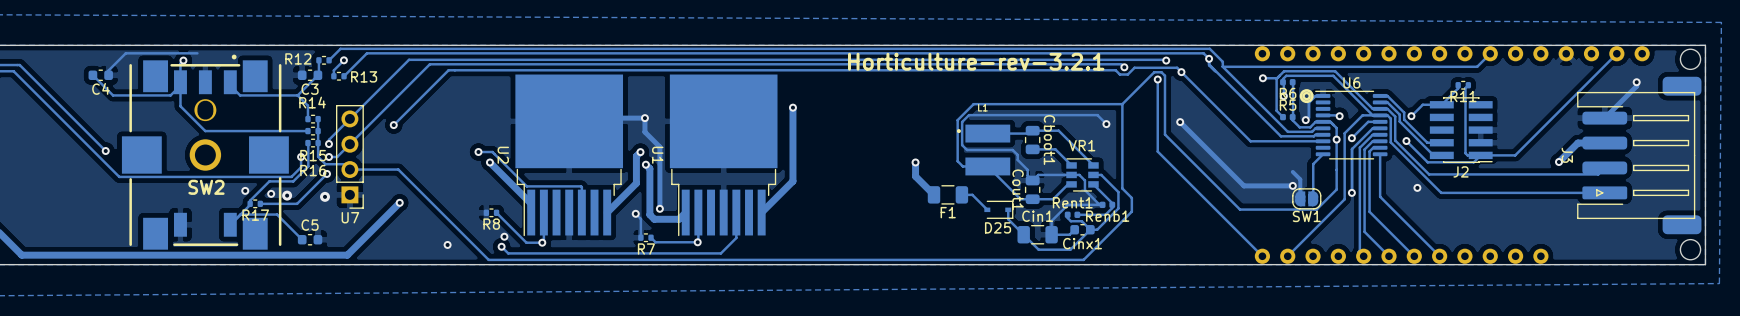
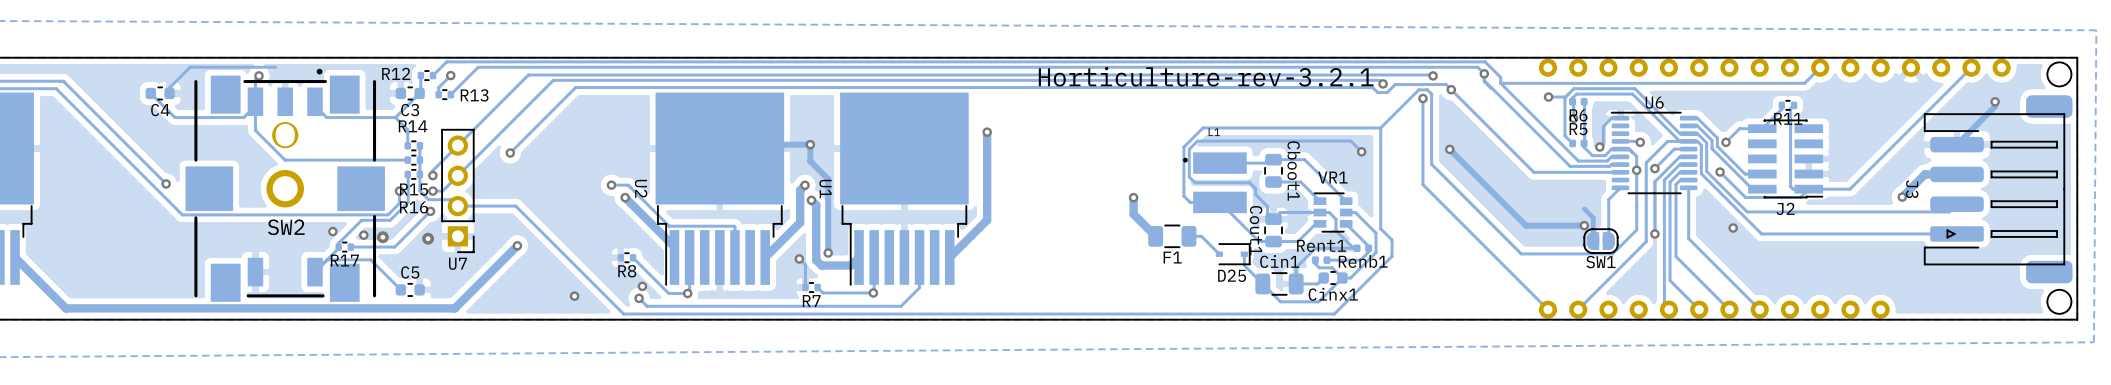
drawing: [1299, 89, 1314, 104] -> none

